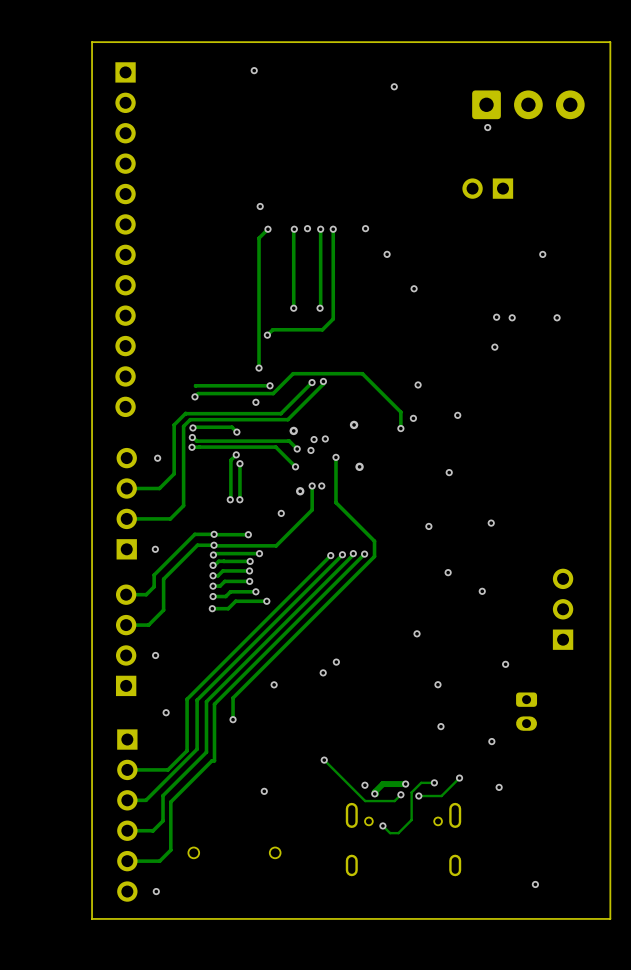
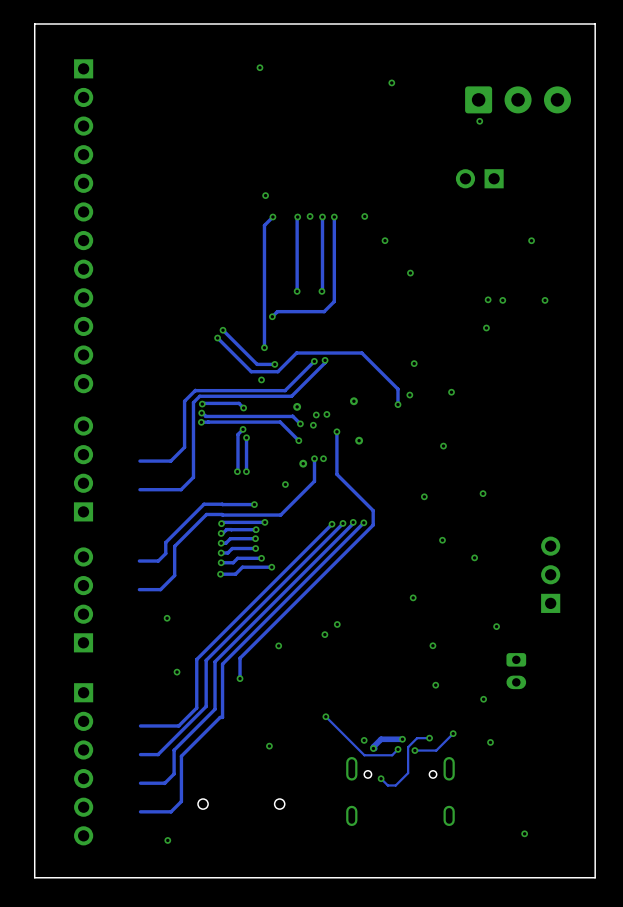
board edge: (610, 42) (92, 42) (92, 918) (610, 918) -> (595, 40) (595, 24) (34, 24) (34, 877) (595, 877) (595, 866)
part position: (125, 239) -> (83, 226)
via: none -> (223, 330)
via: none -> (217, 338)
track: (251, 385) (195, 386) -> (257, 364) (223, 330)
track: (245, 393) (198, 393) (194, 396) -> (251, 371) (217, 338)
via: (194, 396) -> none
via: (157, 458) -> none
part position: (126, 503) -> (83, 468)
via: (214, 534) -> none
via: (214, 545) -> none
via: (155, 549) -> none
part position: (126, 640) -> (83, 599)
part position: (127, 815) -> (83, 764)

